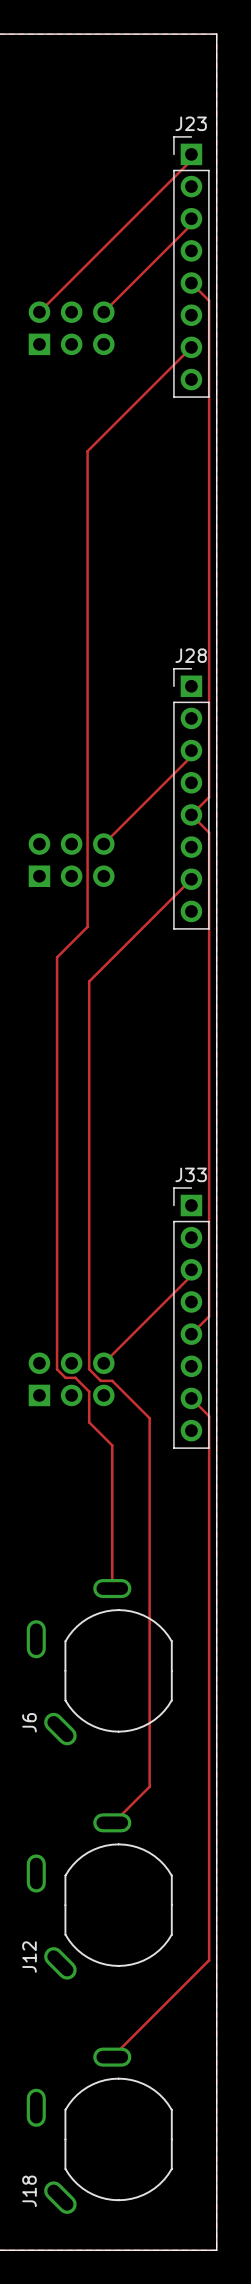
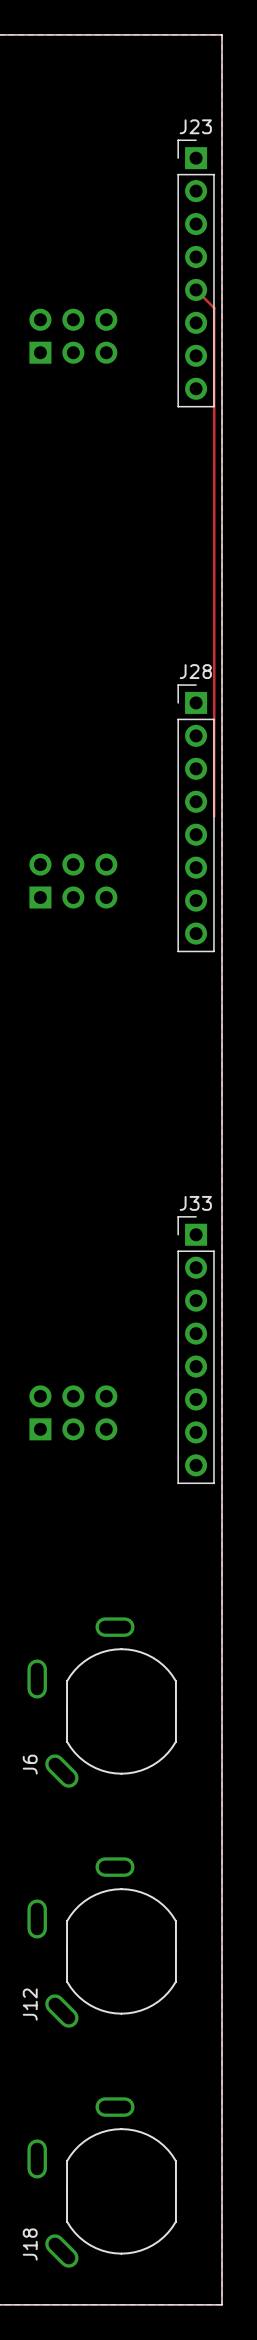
track: (191, 154) (191, 160) (39, 312) -> none
track: (191, 218) (191, 224) (103, 312) -> none
track: (191, 347) (87, 451) (87, 926) (57, 957) (57, 1369) (65, 1377) (75, 1377) (89, 1391) (89, 1422) (112, 1445) (112, 1588) -> none
track: (191, 750) (191, 756) (103, 844) -> none
track: (209, 797) (191, 814) (209, 832) (209, 1316) (191, 1334) -> none
track: (191, 879) (89, 981) (89, 1369) (100, 1380) (112, 1380) (149, 1418) (149, 1786) (112, 1822) -> none
track: (191, 1269) (191, 1275) (103, 1363) -> none
track: (191, 1398) (209, 1416) (209, 1960) (112, 2057) -> none

